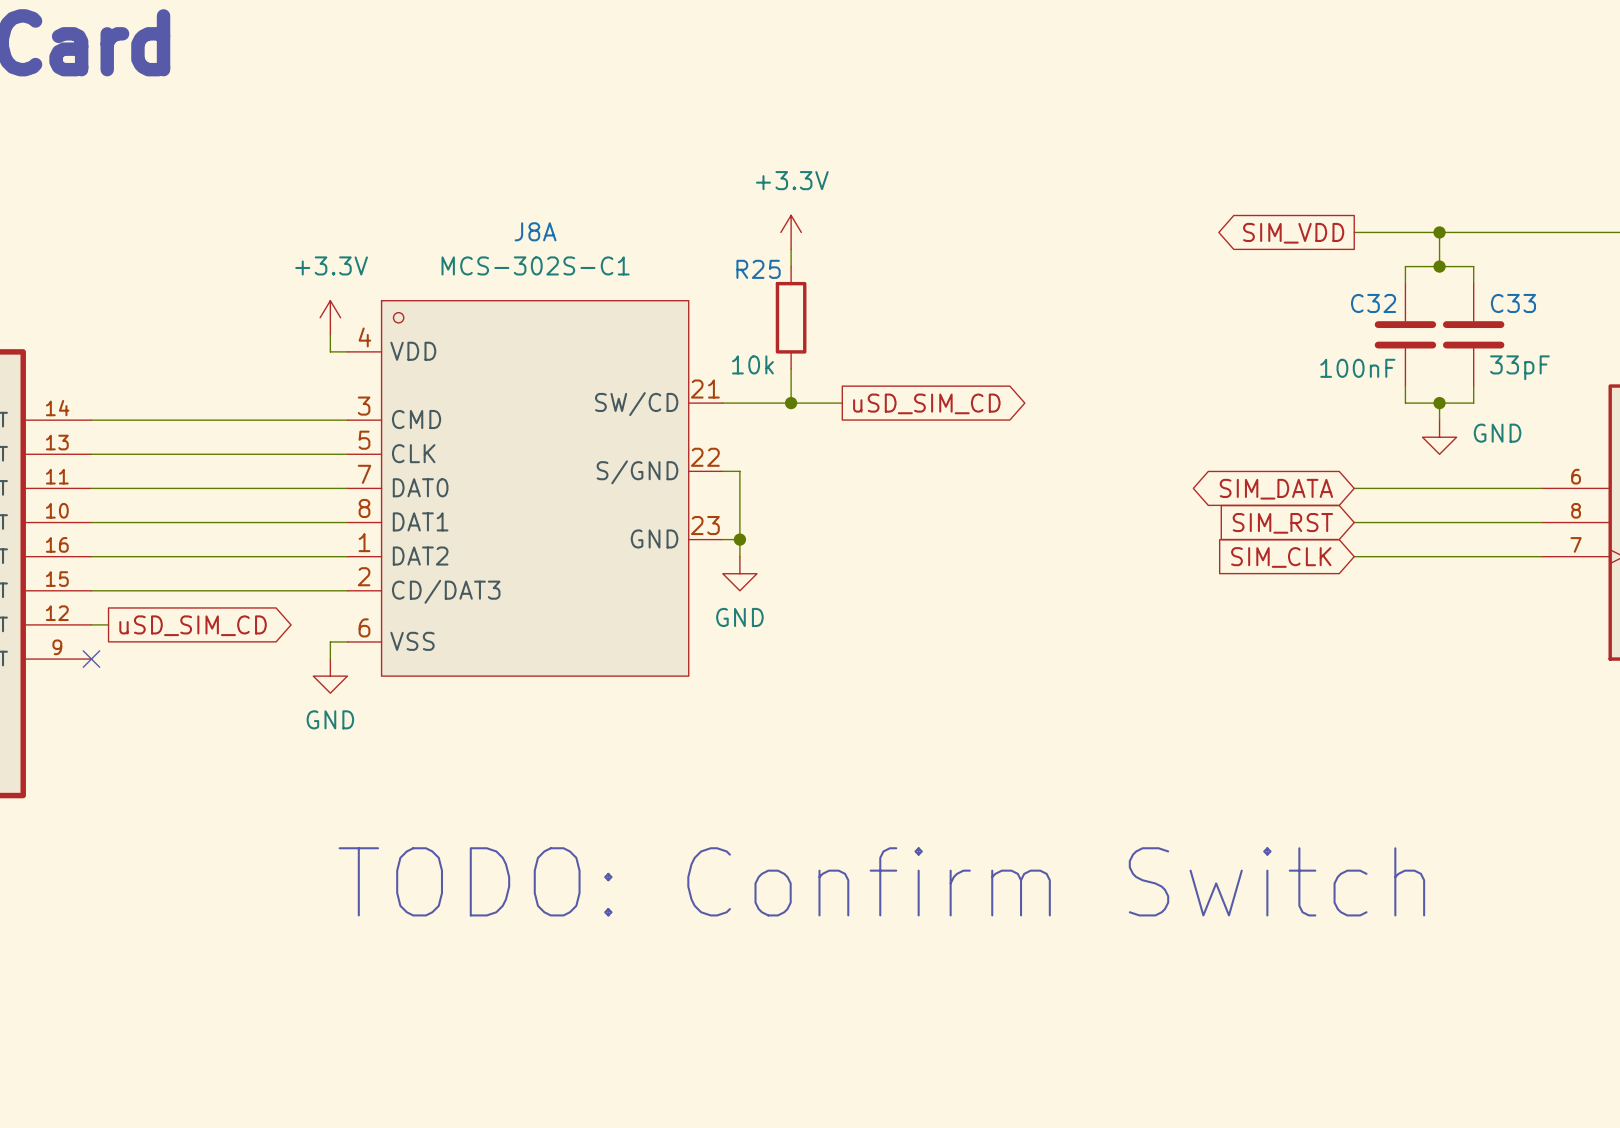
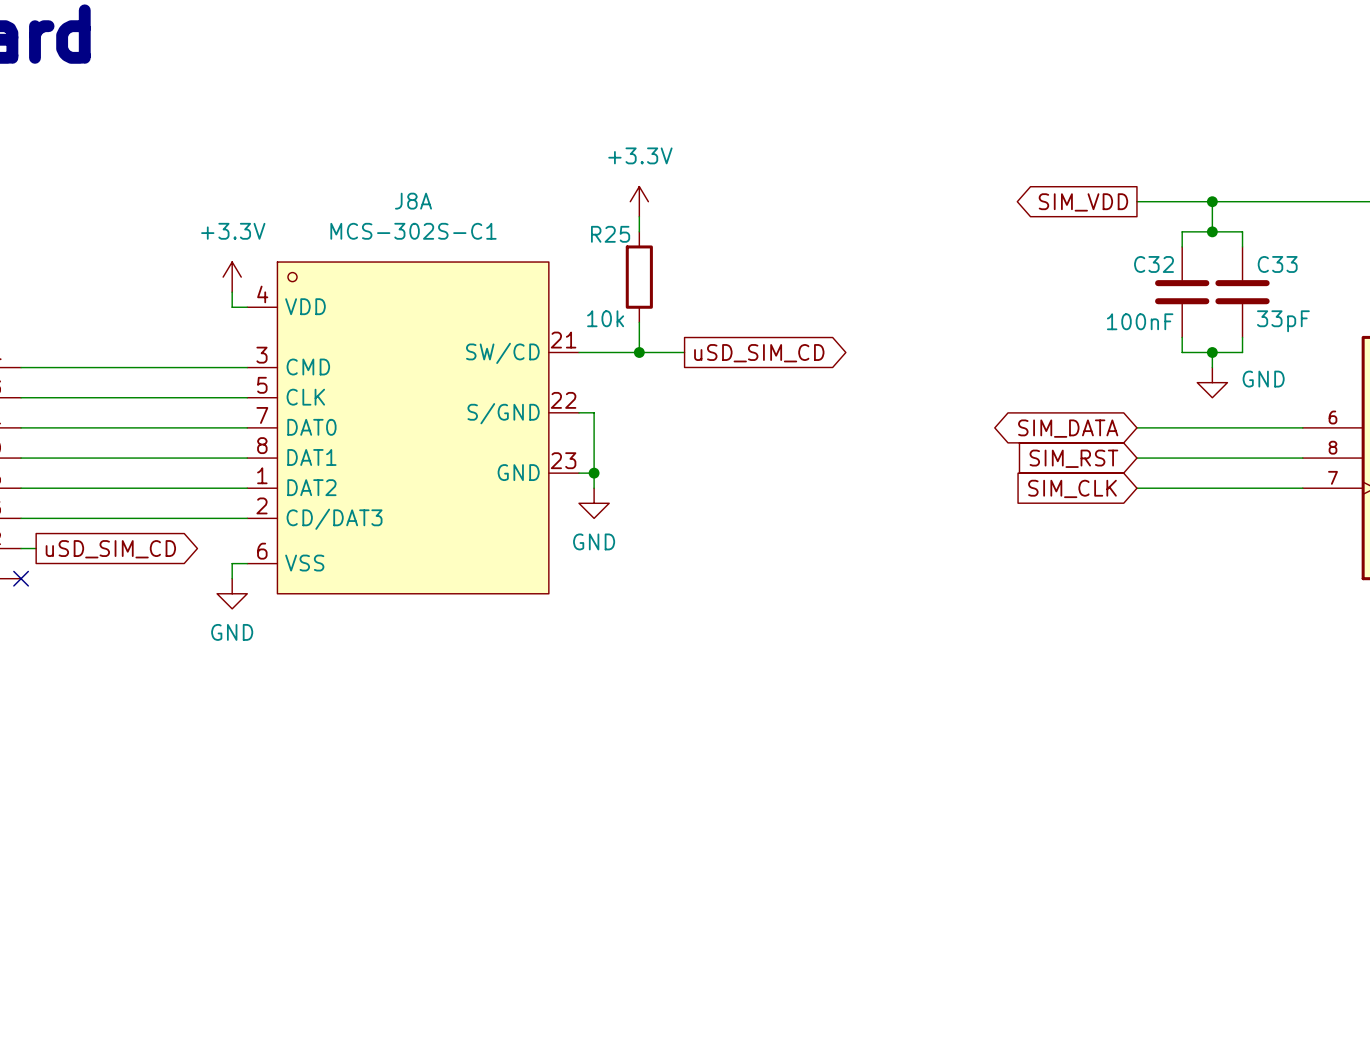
text: TODO: Confirm Switch (881, 881) -> none

